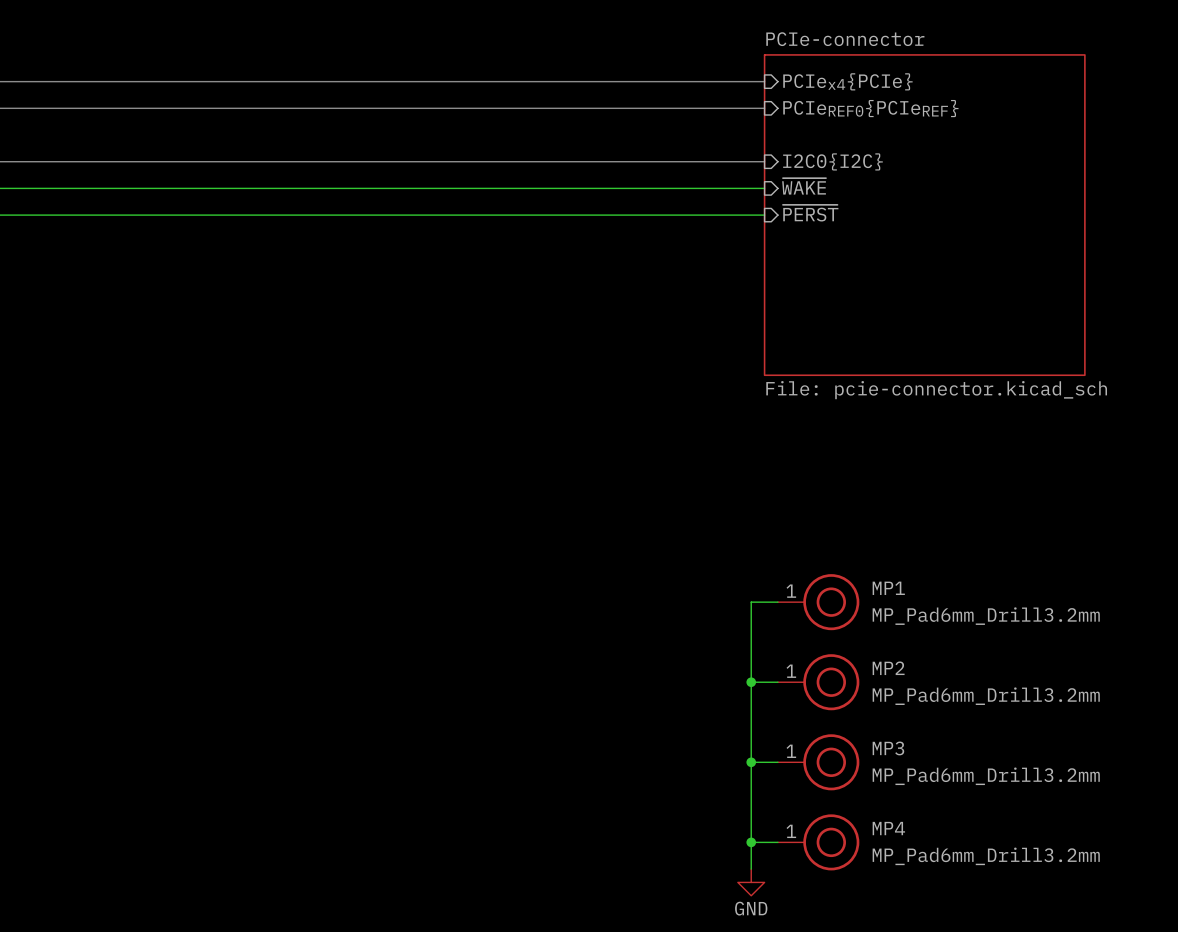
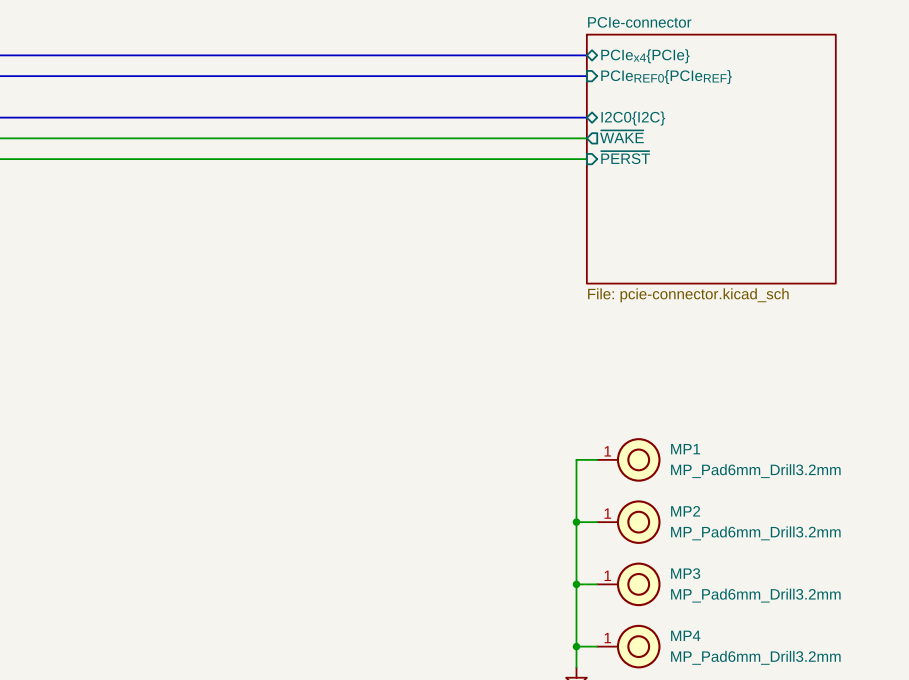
sheet pin shape: input (847, 81) -> bidirectional (645, 56)
sheet pin shape: input (832, 161) -> bidirectional (633, 118)
sheet pin shape: input (804, 186) -> output (621, 136)

